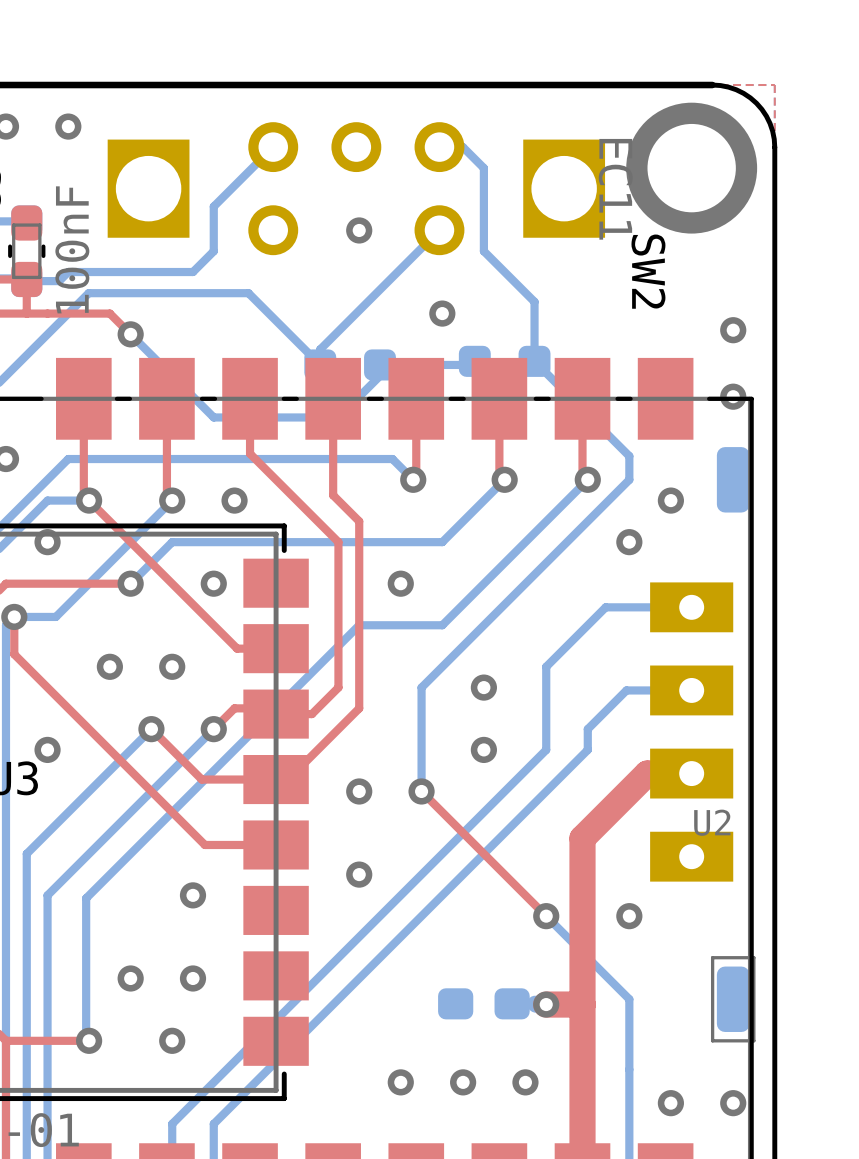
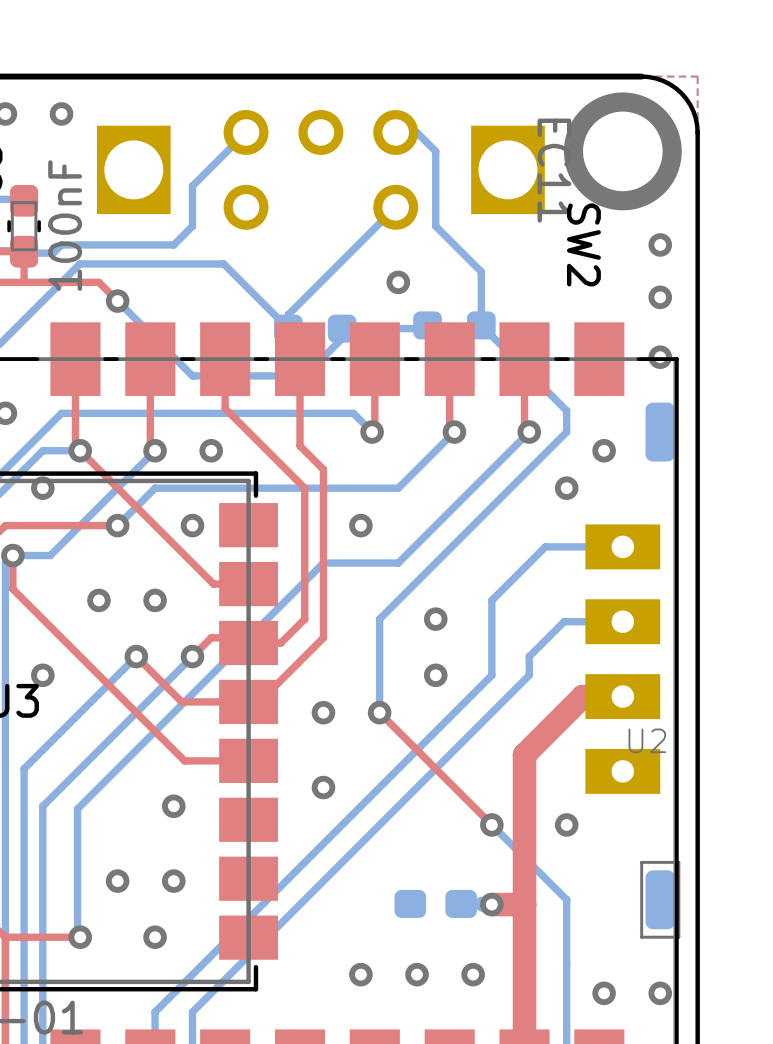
via: (359, 230) -> none
via: none -> (660, 244)

